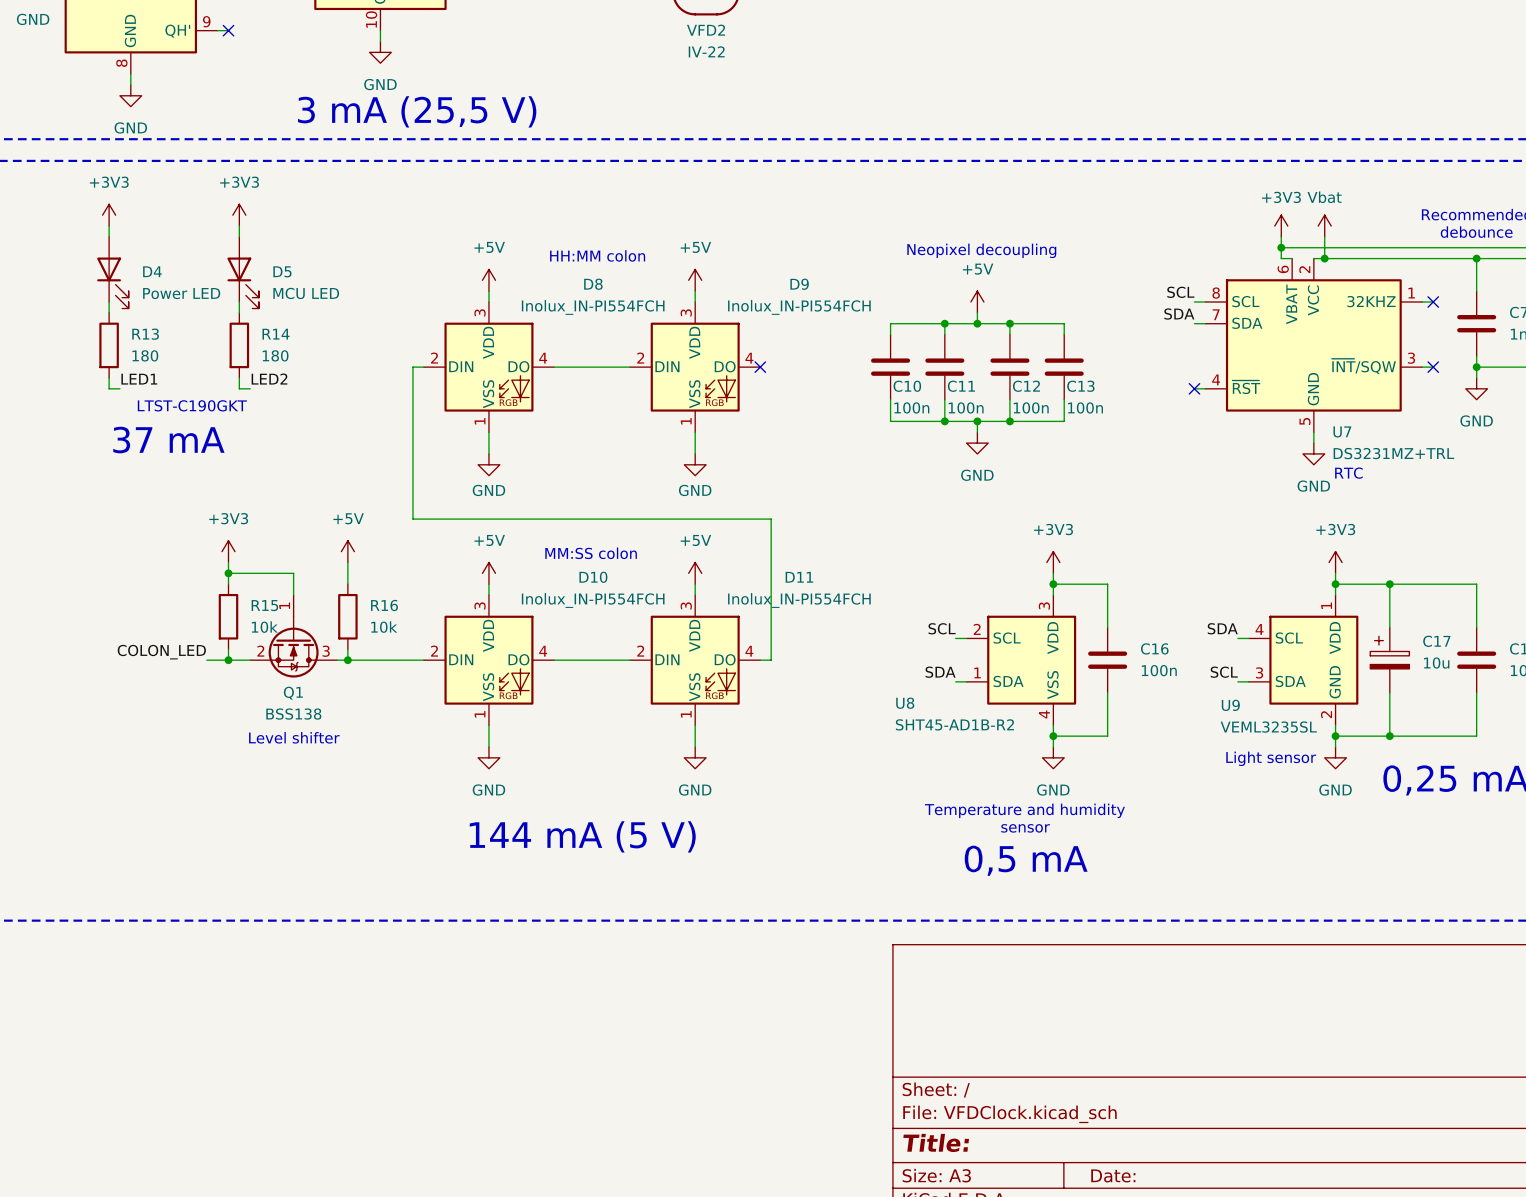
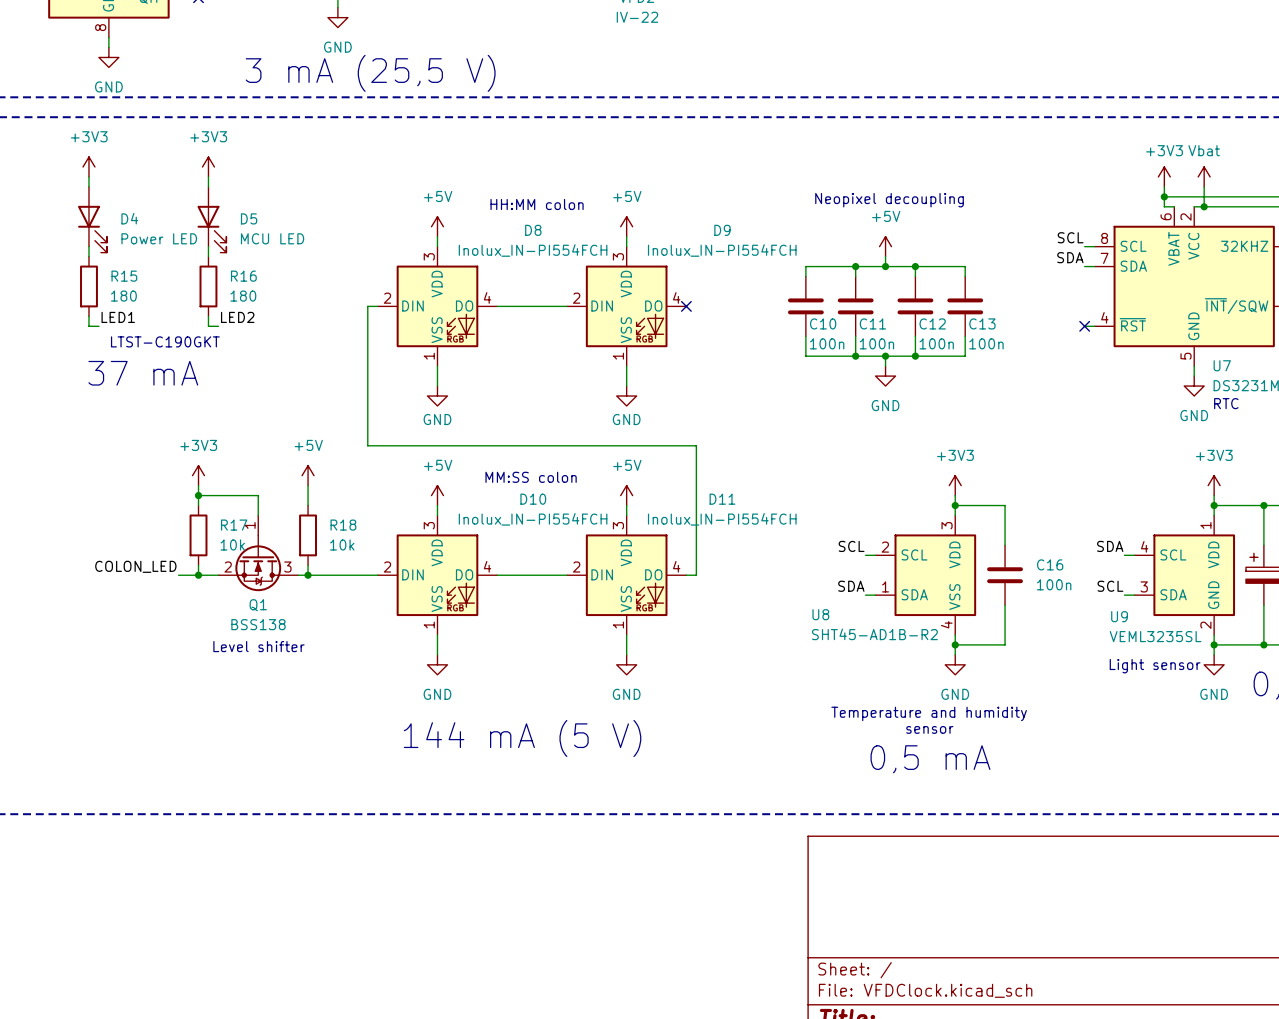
R13 name: R13 (145, 334) -> R15 (124, 276)
R14 name: R14 (276, 334) -> R16 (243, 276)
R15 name: R15 (264, 605) -> R17 (234, 525)
R16 name: R16 (384, 605) -> R18 (343, 525)

